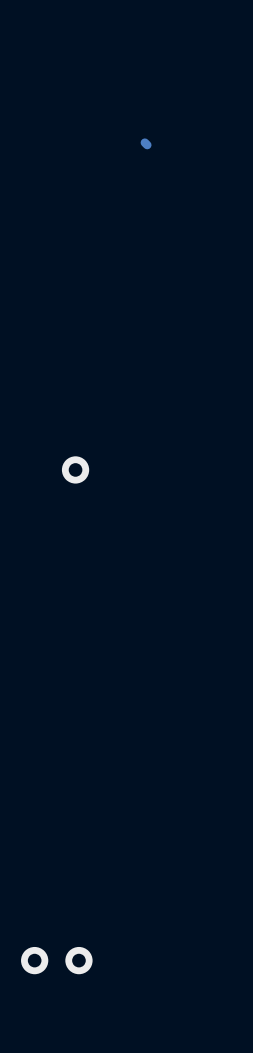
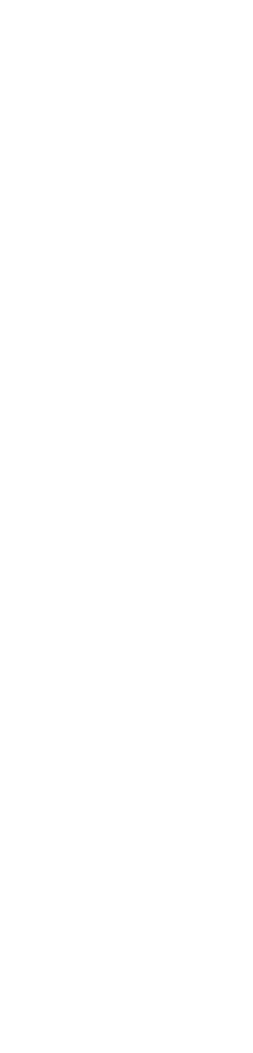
track: (144, 142) (147, 145) -> none
via: (75, 469) -> none
via: (34, 960) -> none
via: (78, 960) -> none

